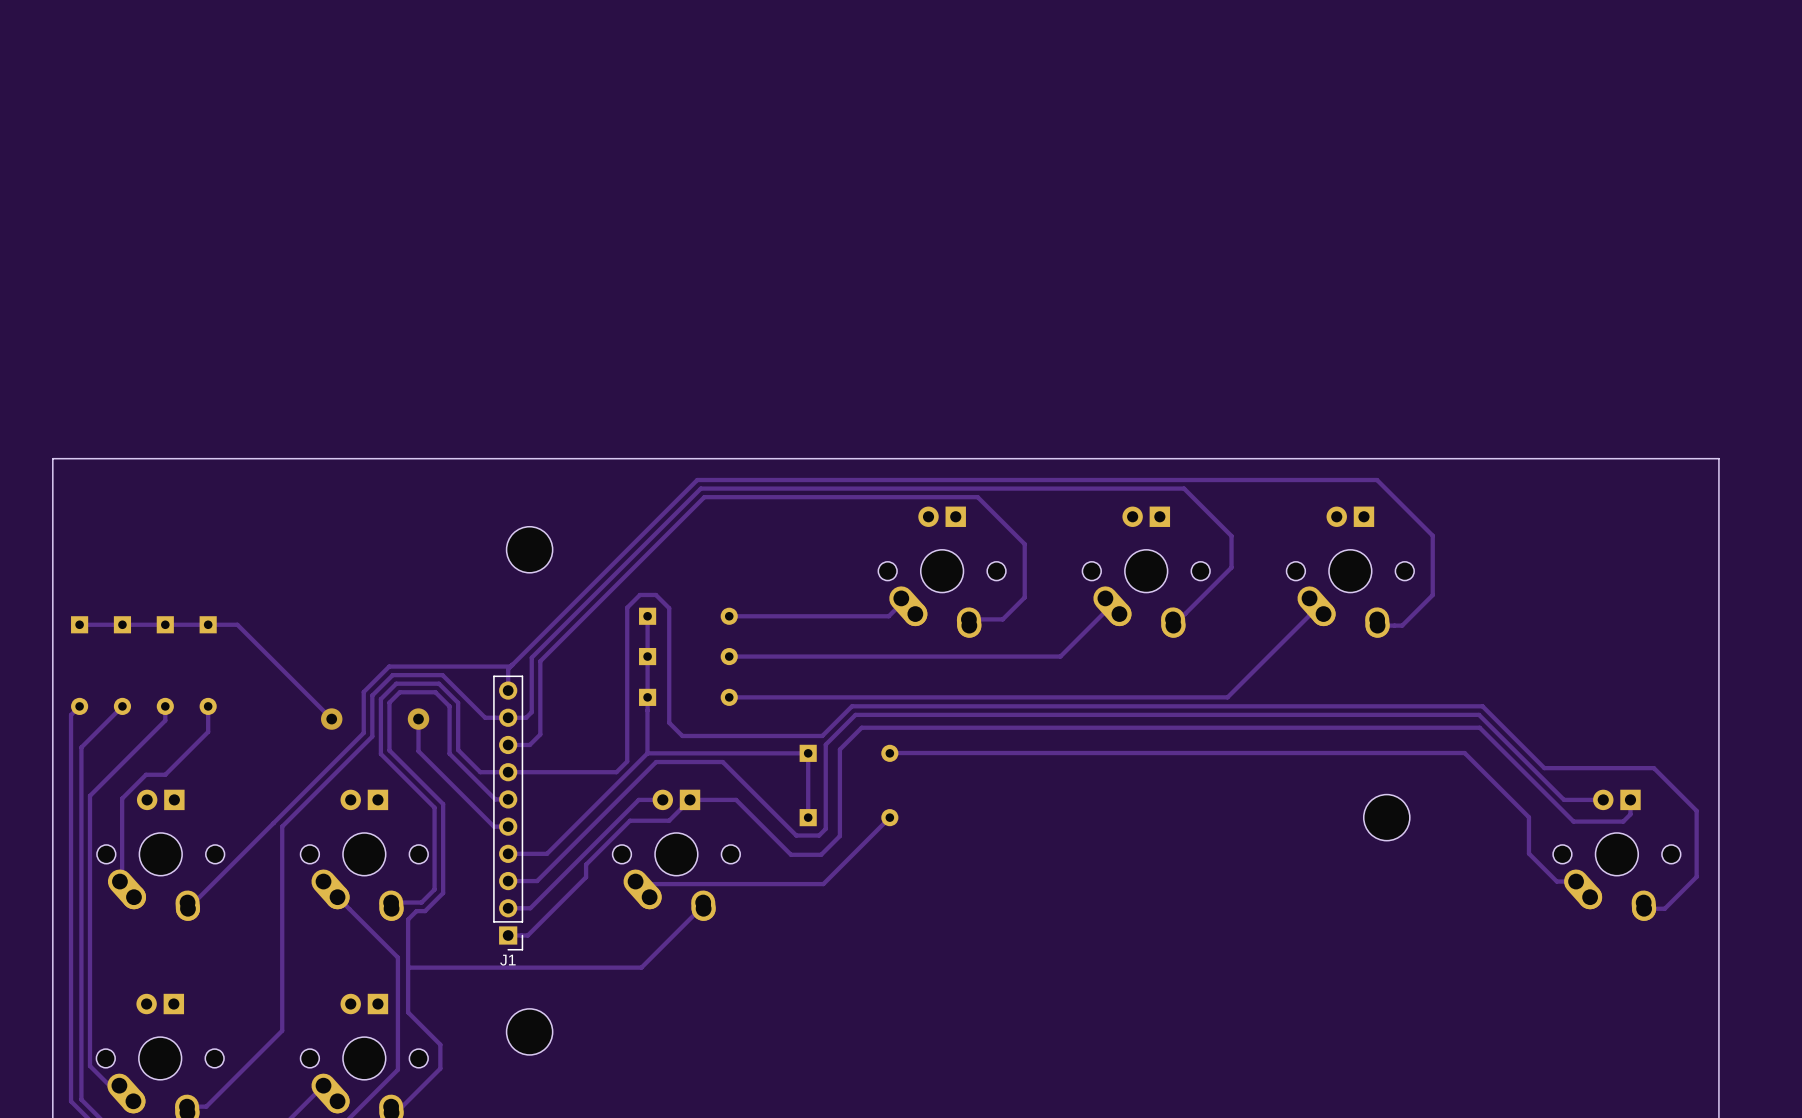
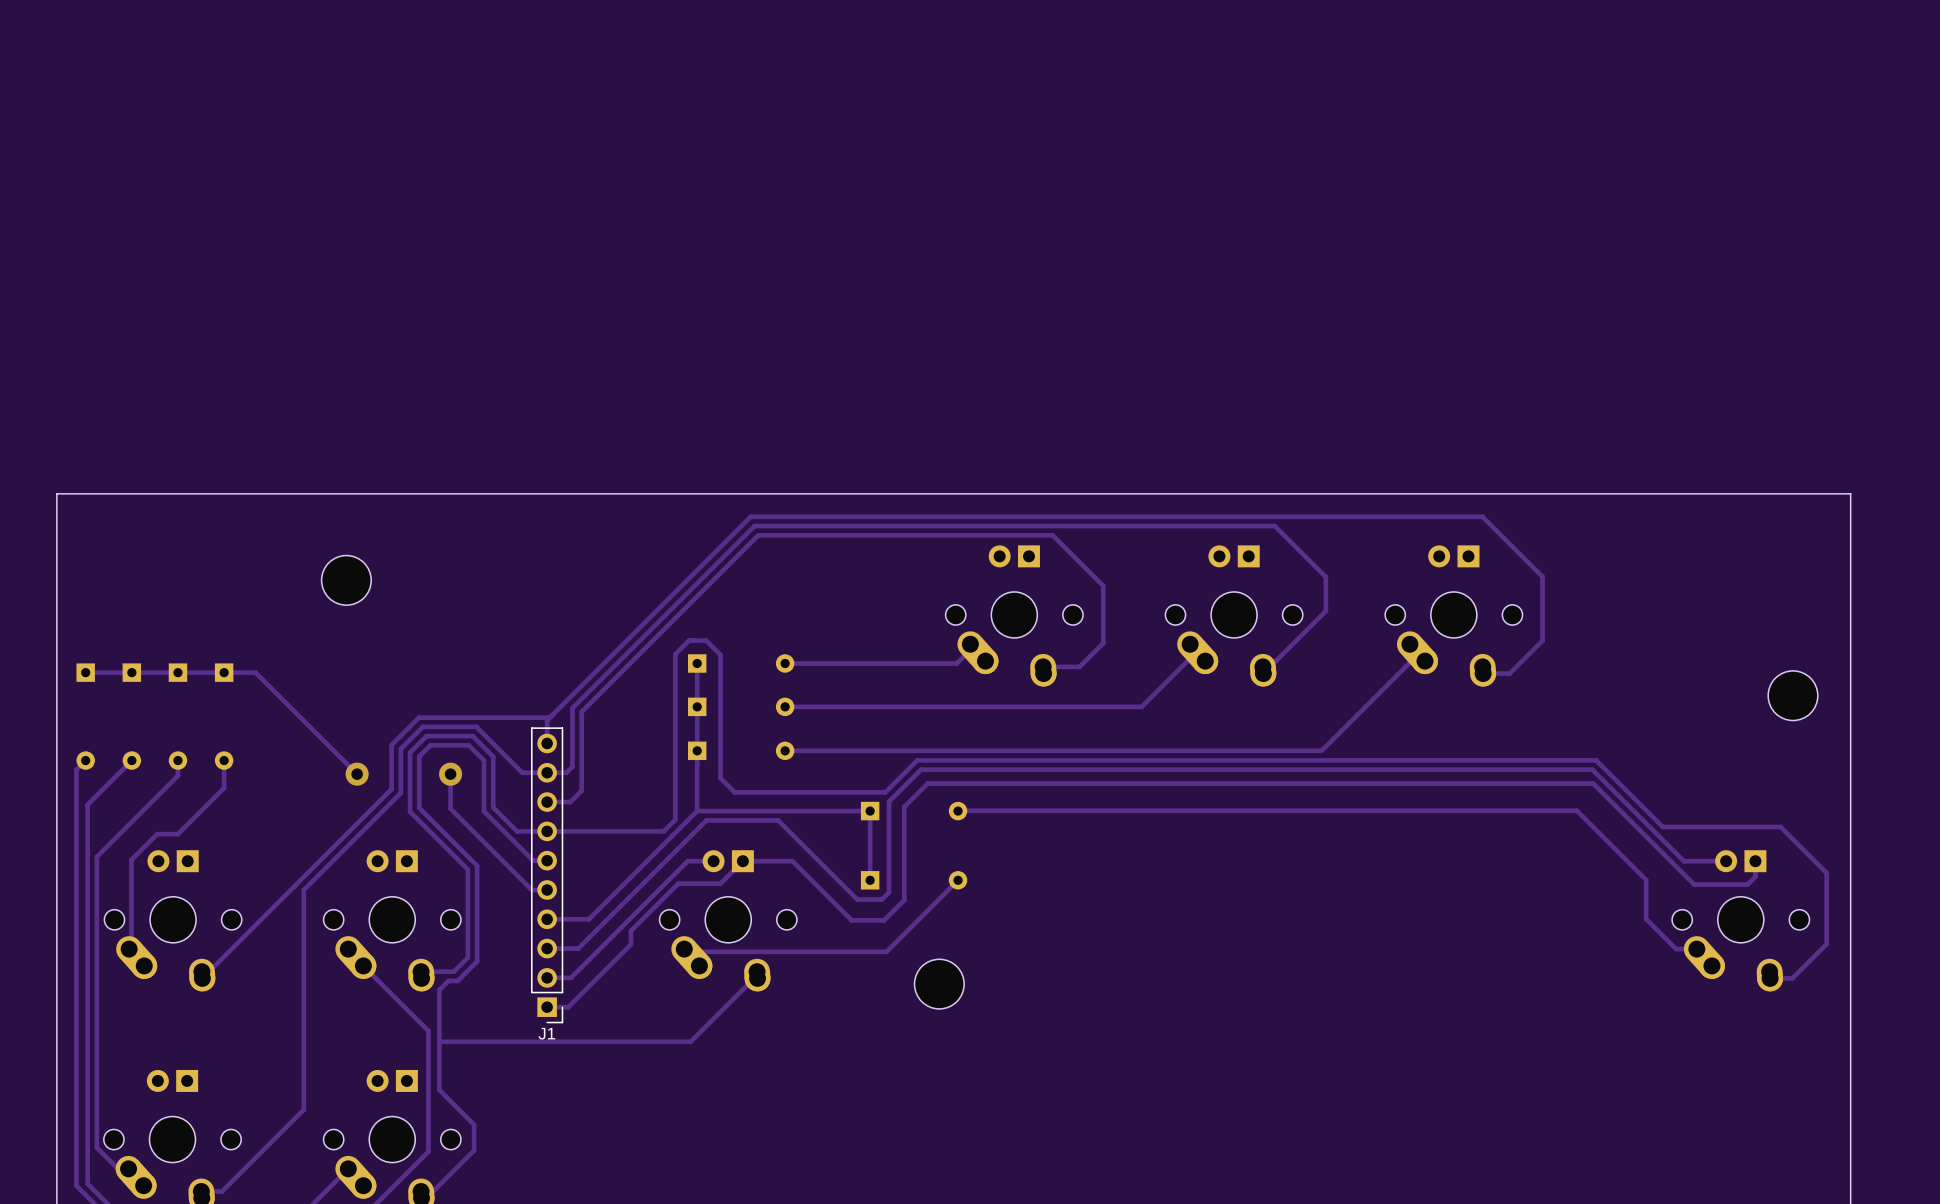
part position: (529, 549) -> (346, 580)
part: none -> (1792, 695)
part: (1386, 817) -> none
part: none -> (939, 984)
part: (529, 1031) -> none

